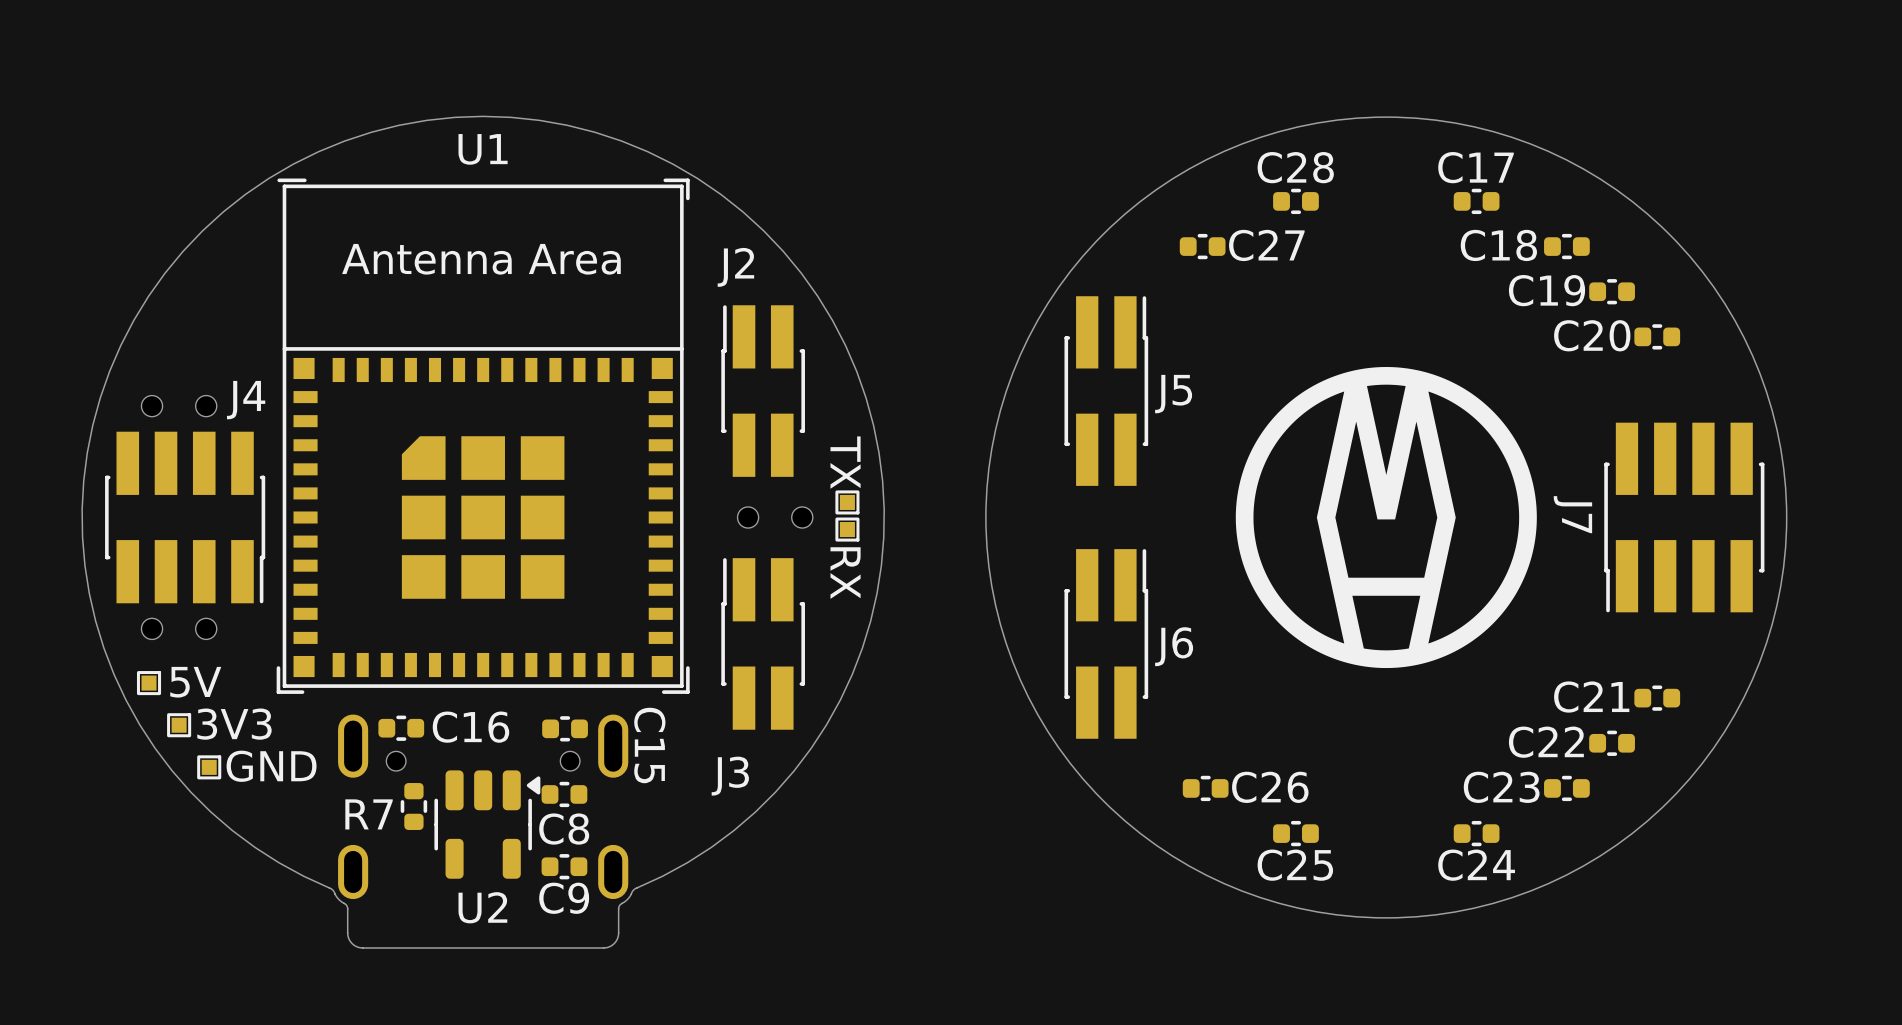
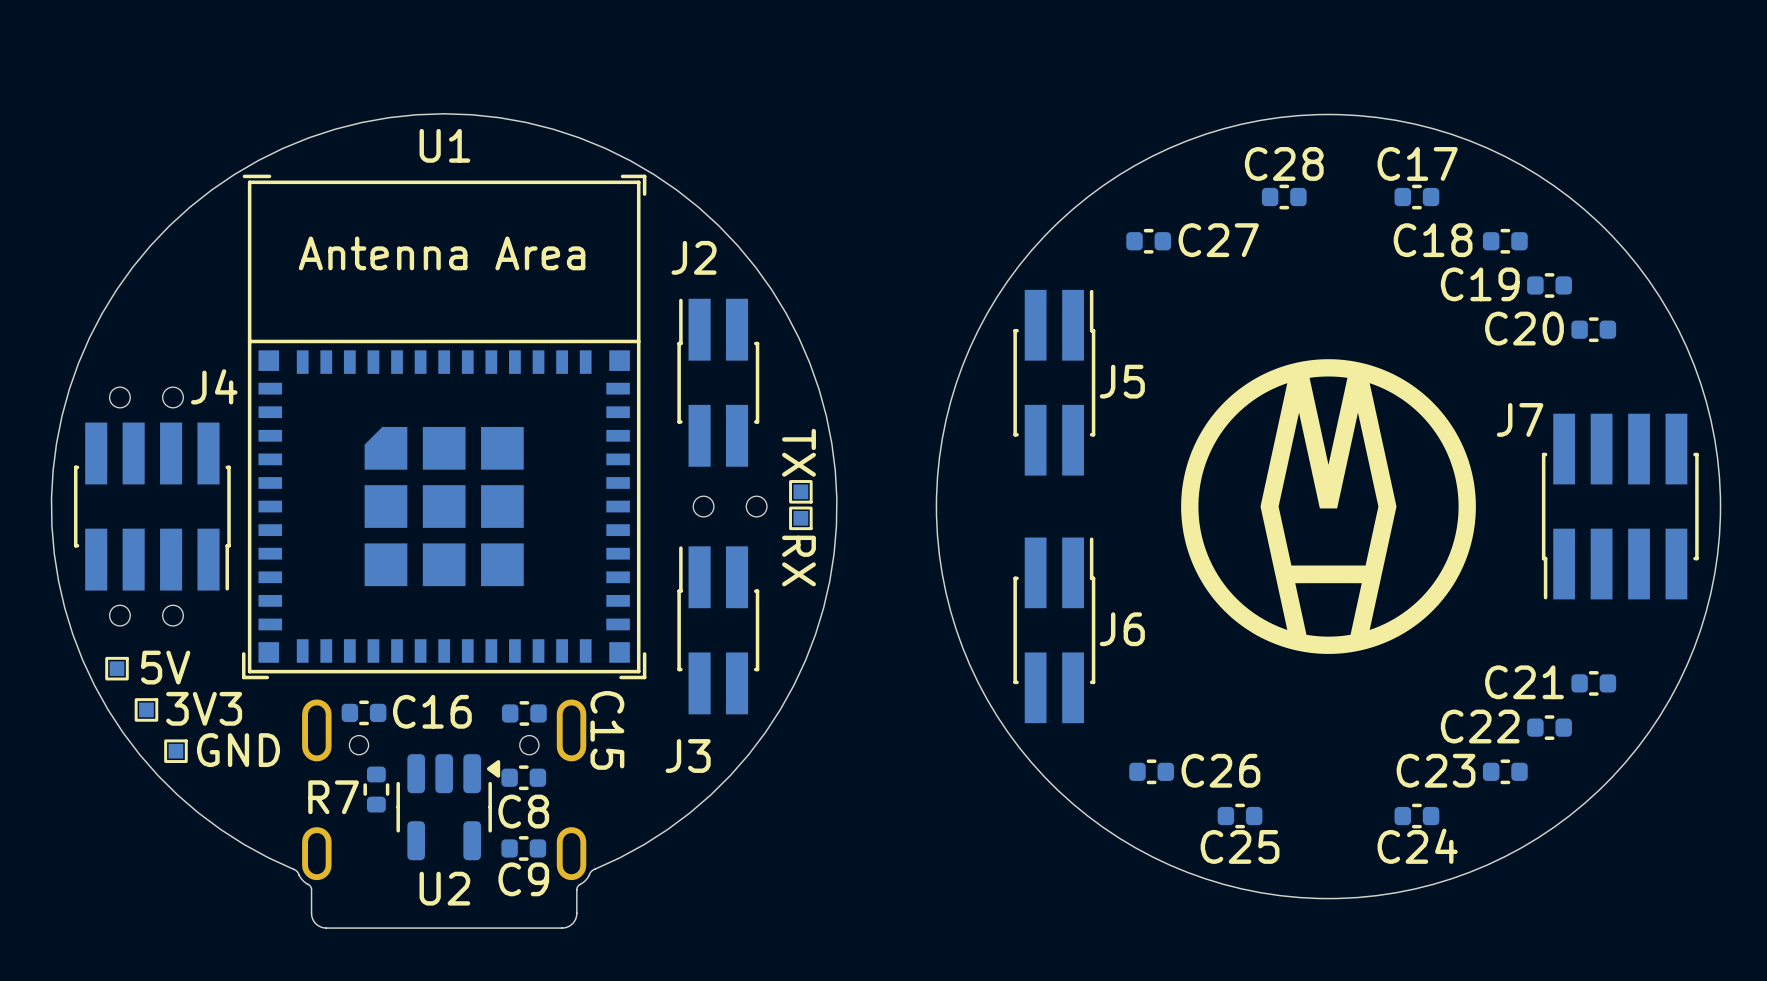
C28 position: (1295, 201) -> (1284, 197)
J7 name rotation: 0° (1572, 514) -> 90° counterclockwise (1520, 419)
J7 name position: J7 (1572, 514) -> J7 (1520, 419)

